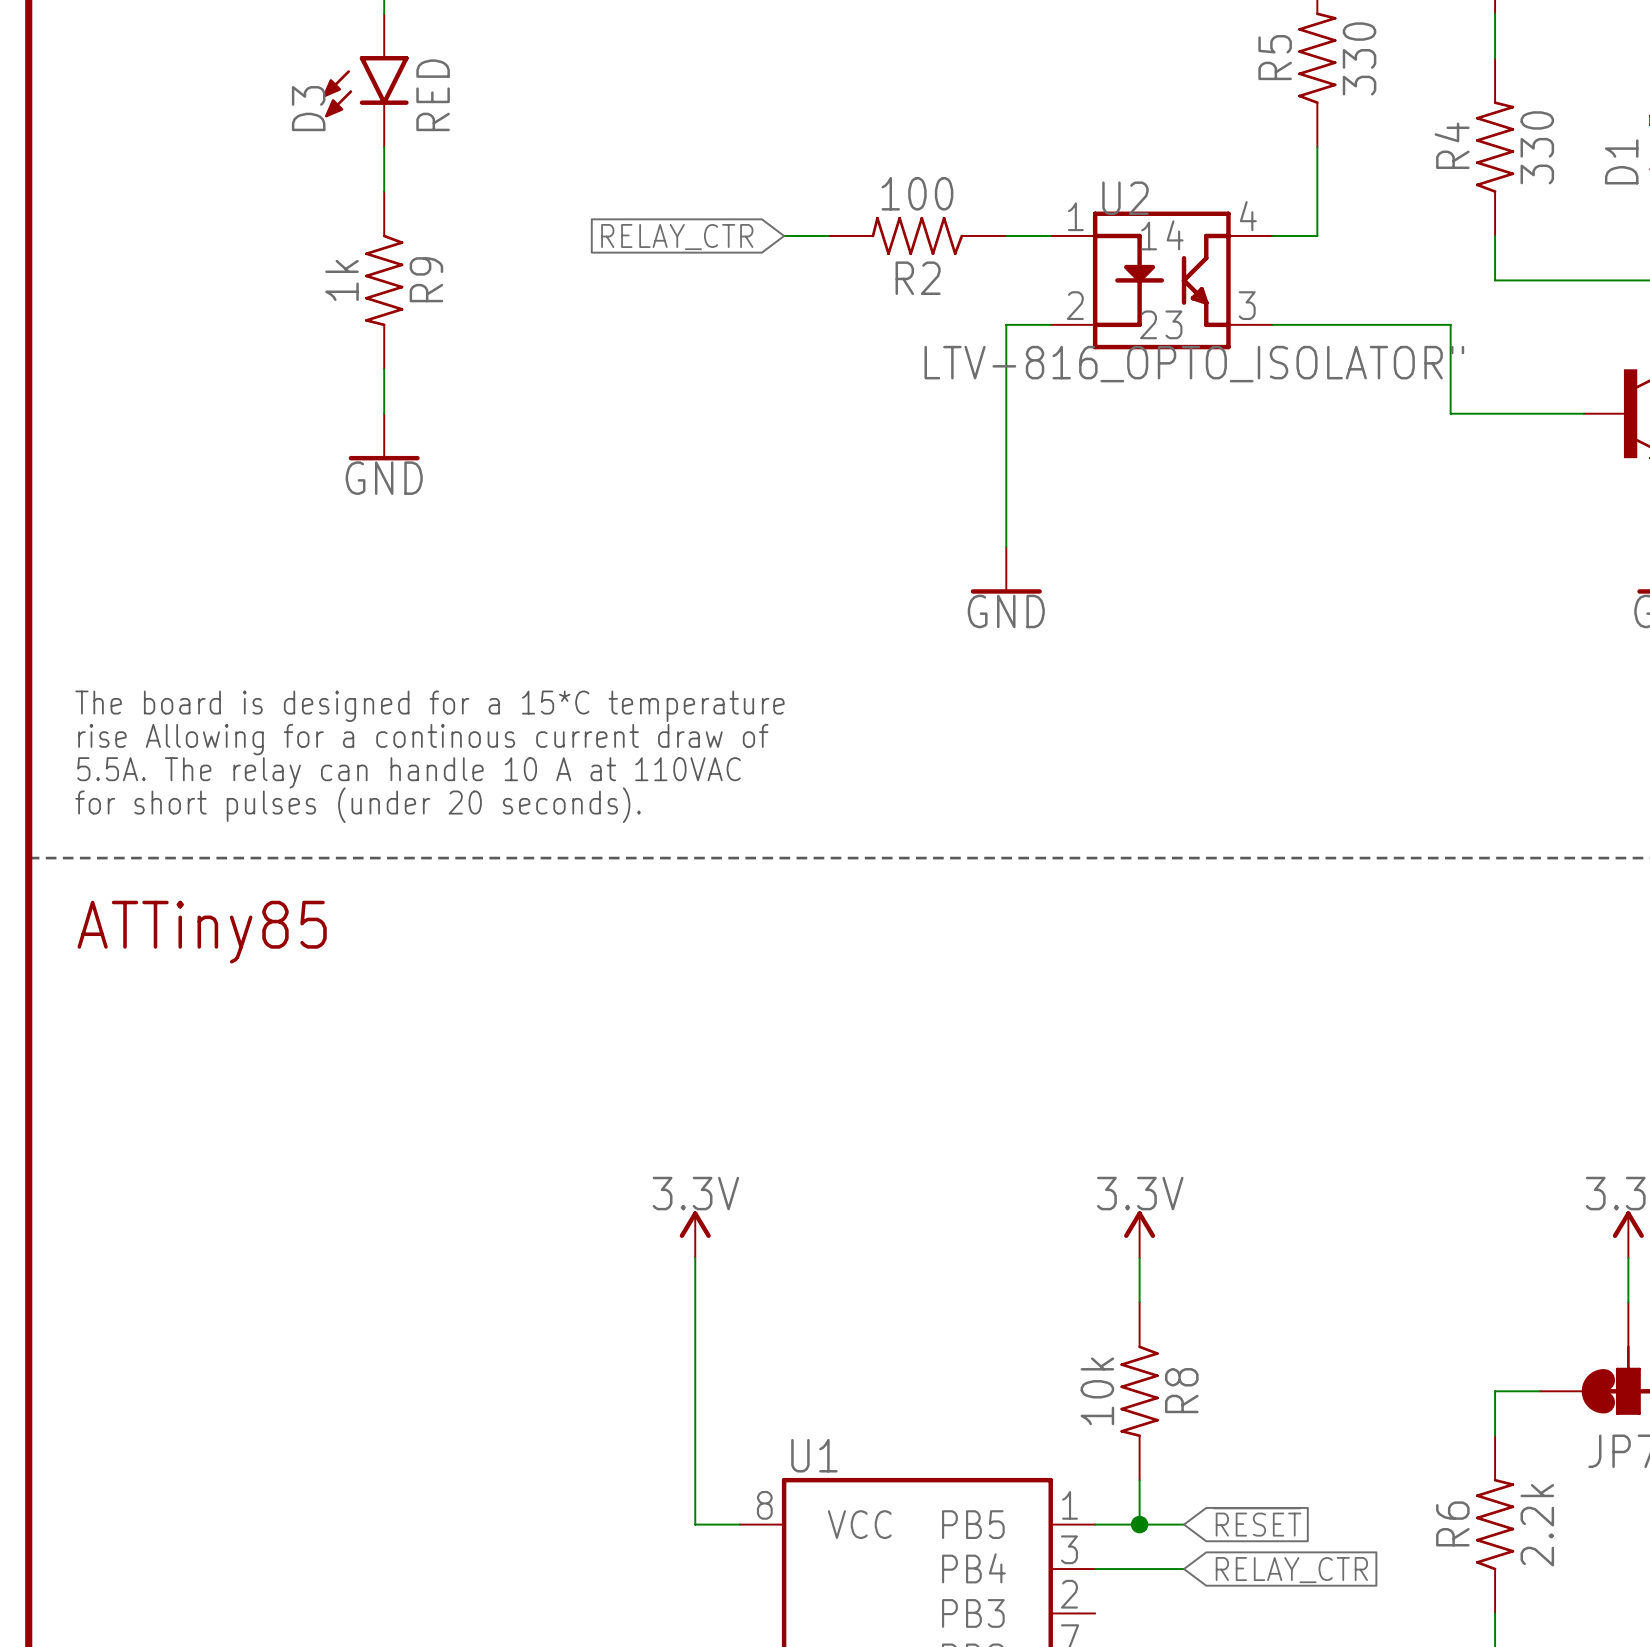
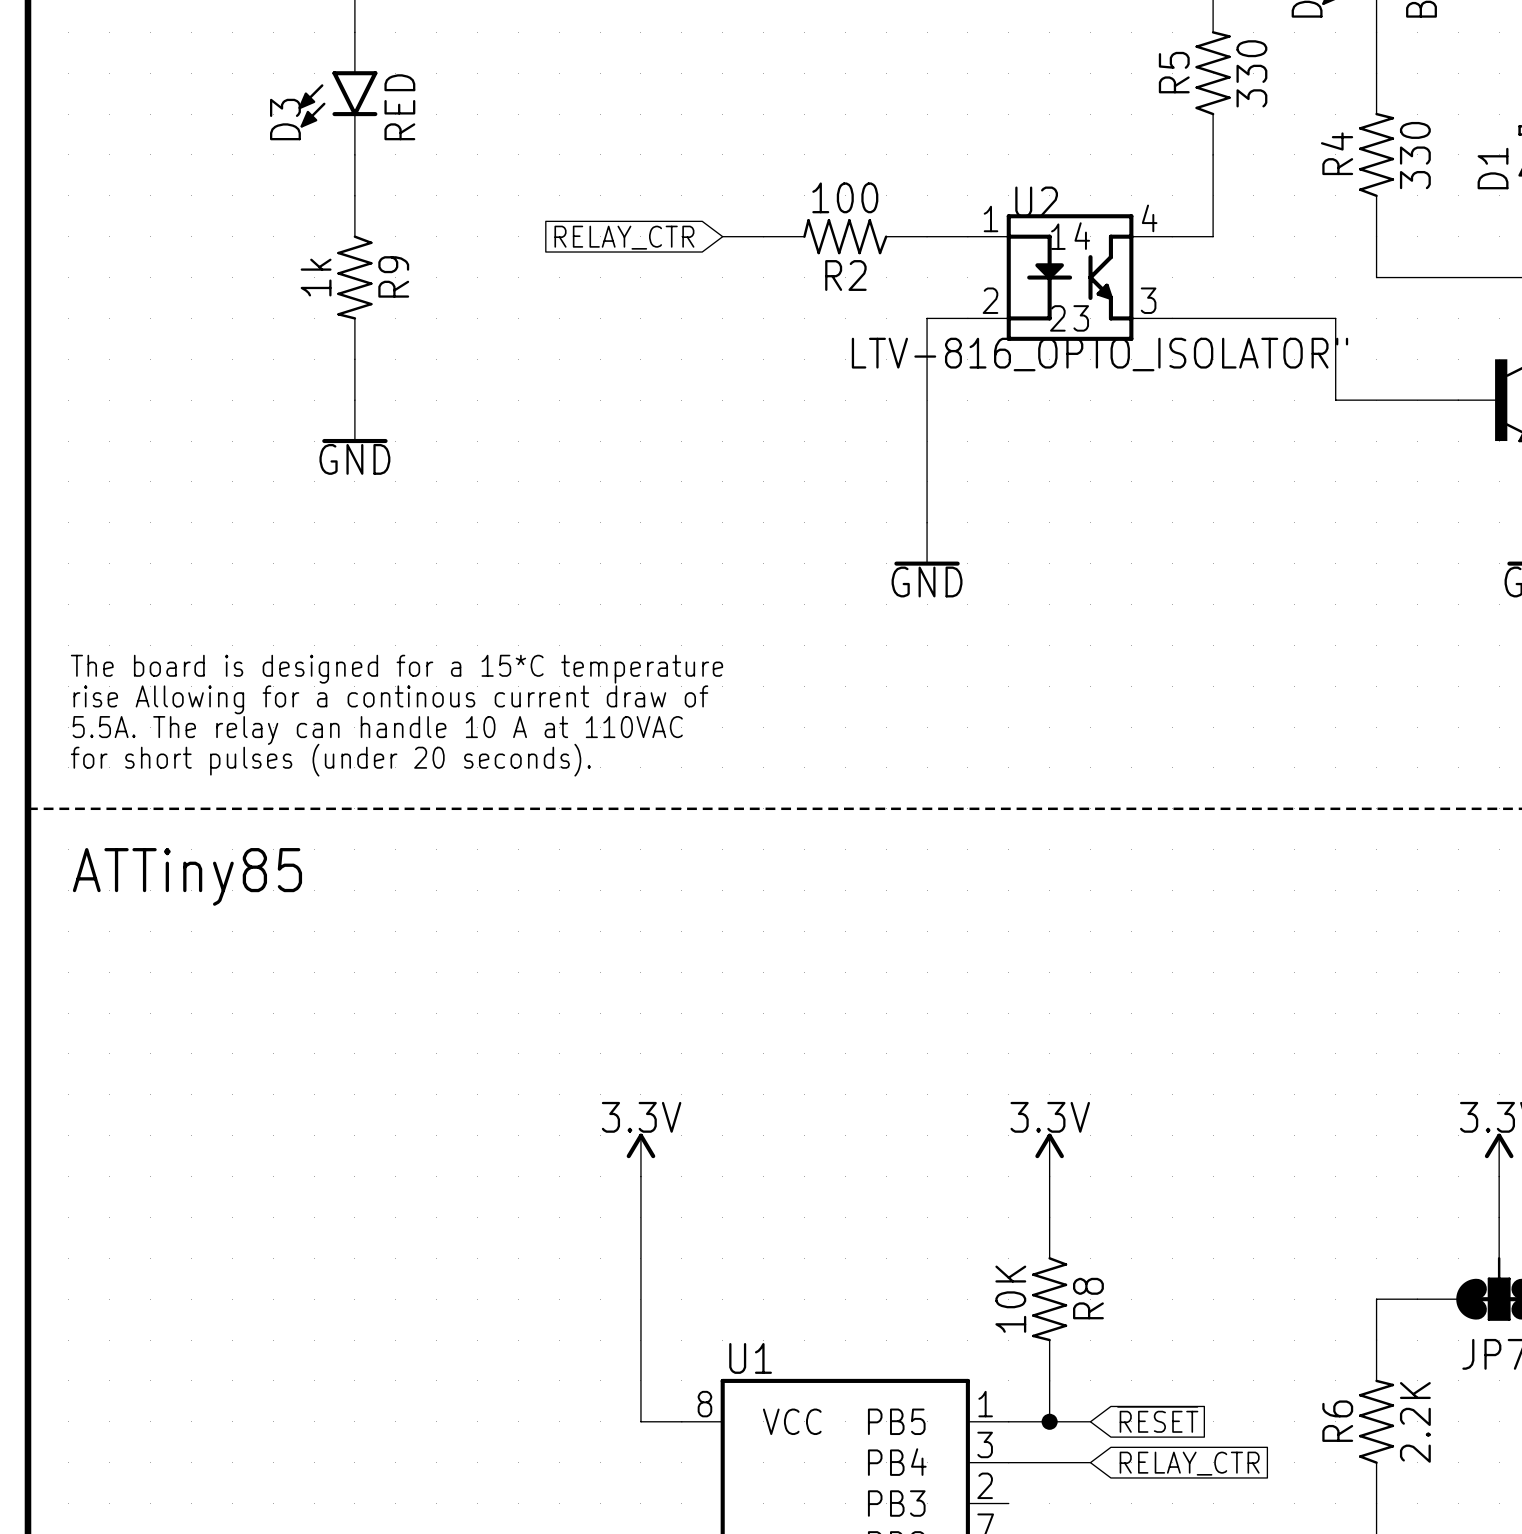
R8 value: 10k (1097, 1391) -> 10K (1010, 1299)
R6 value: 2.2k (1537, 1525) -> 2.2K (1415, 1422)

